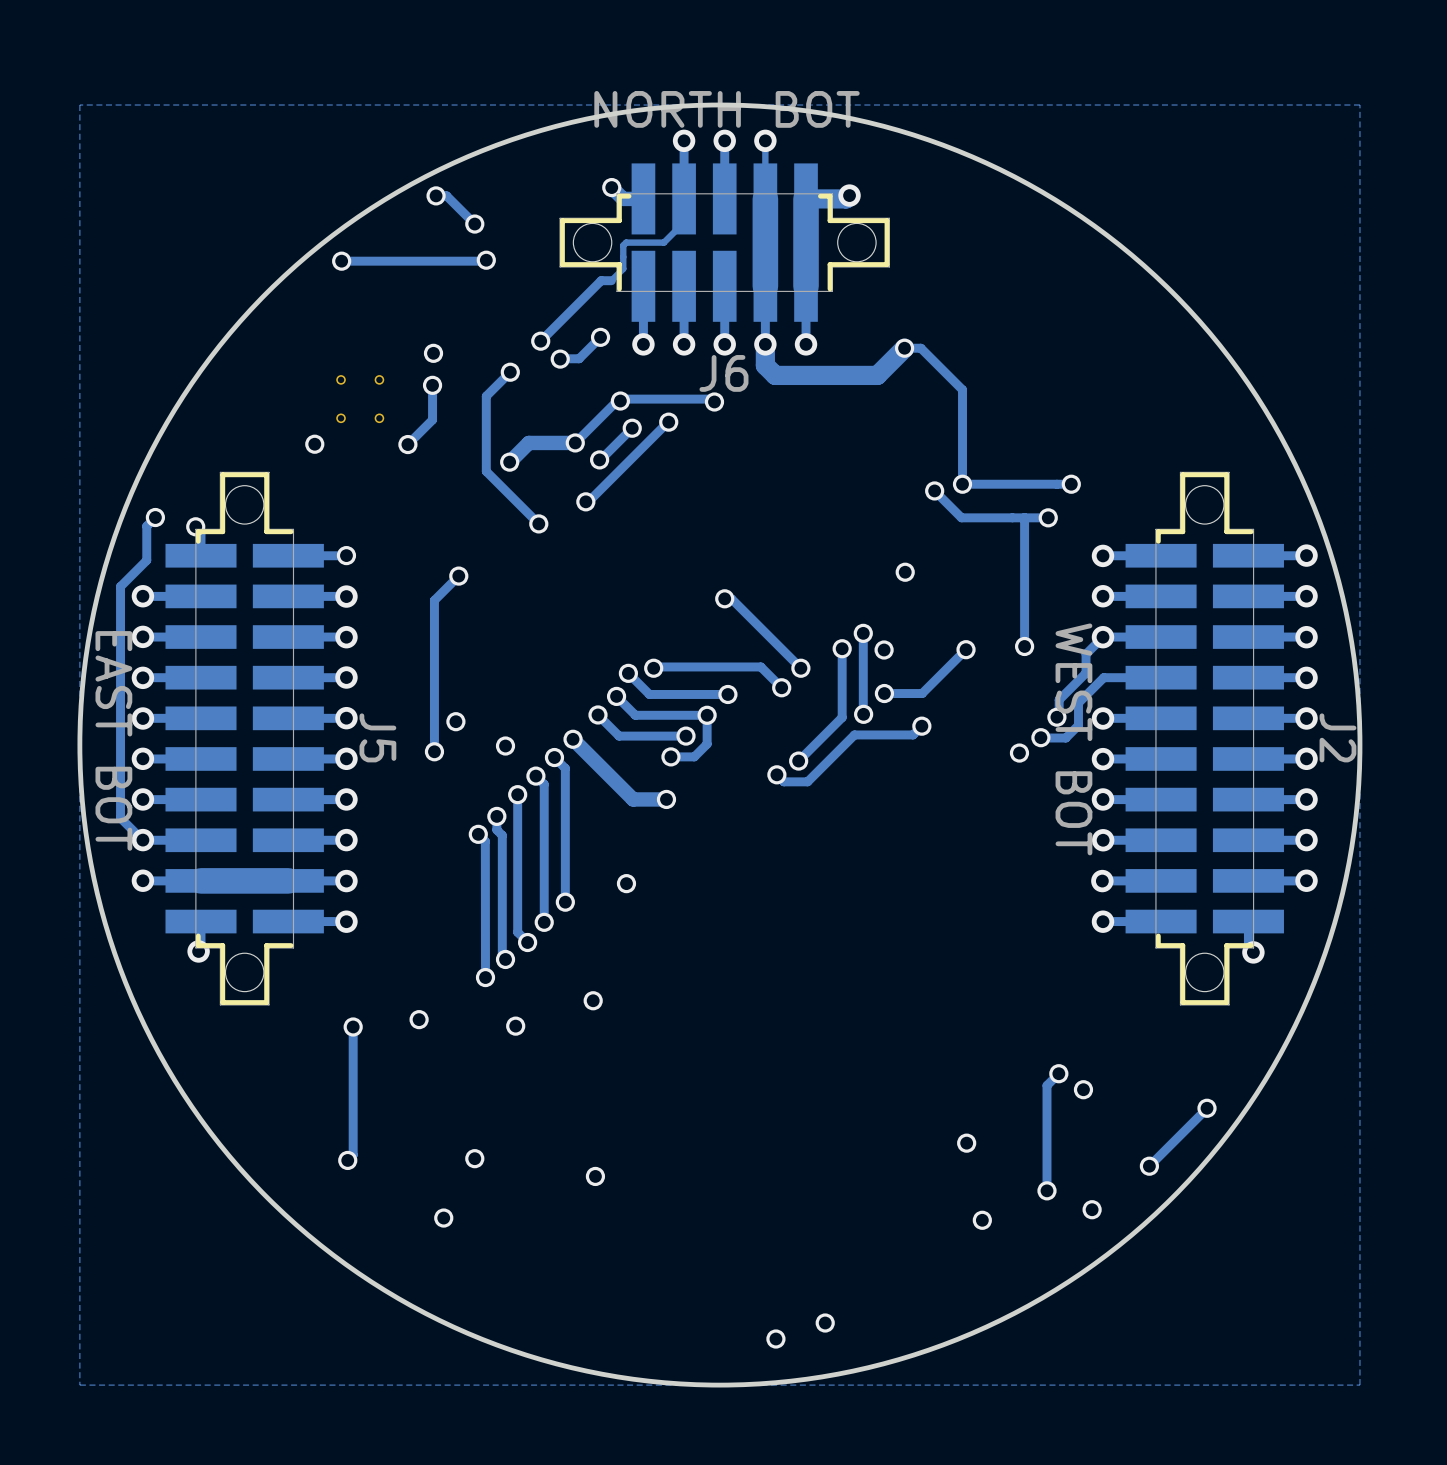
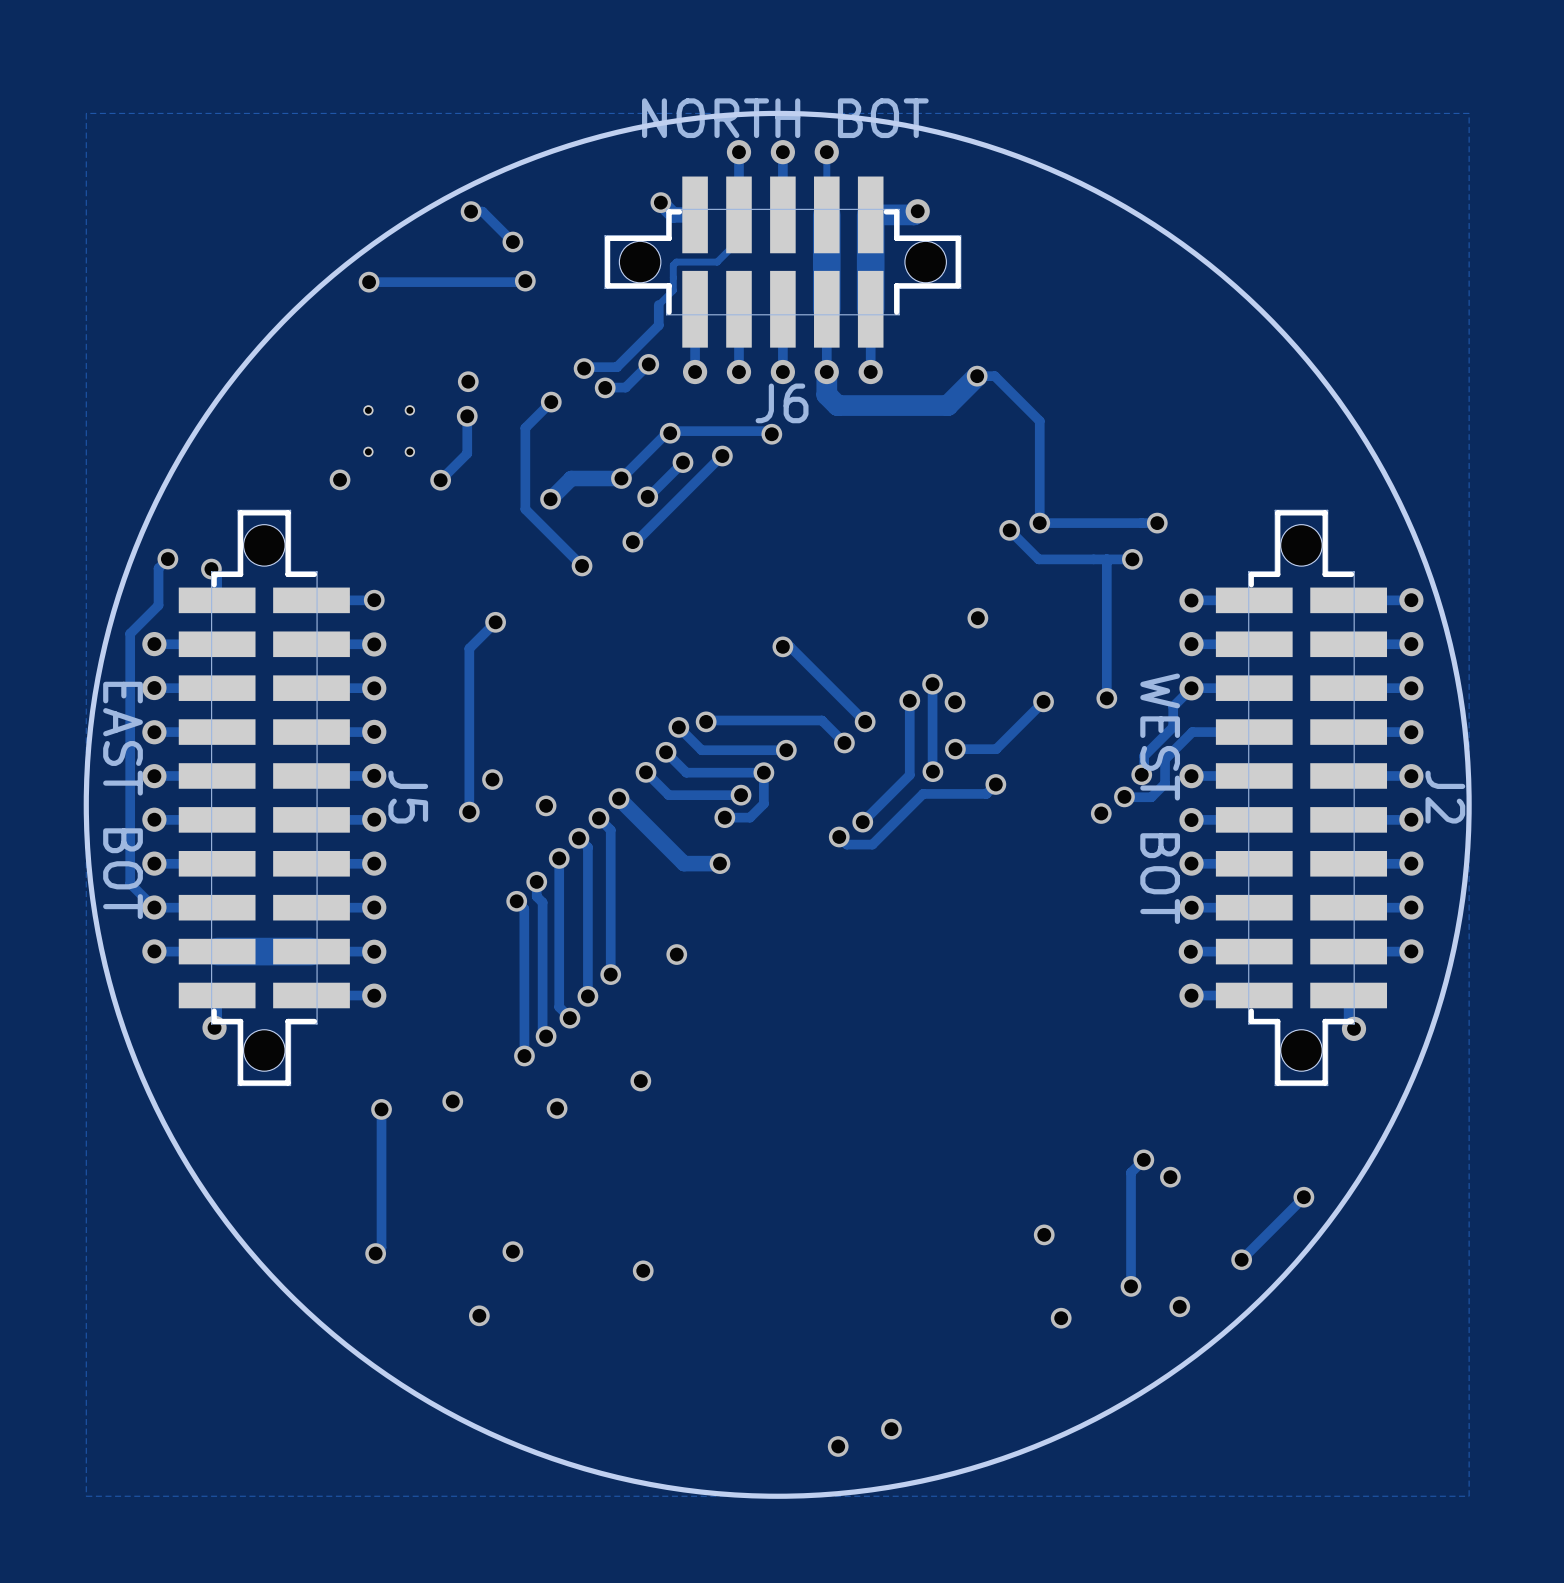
track: (611, 280) (601, 280) (541, 339) -> (660, 303) (658, 304) (658, 325) (616, 367) (585, 367)

